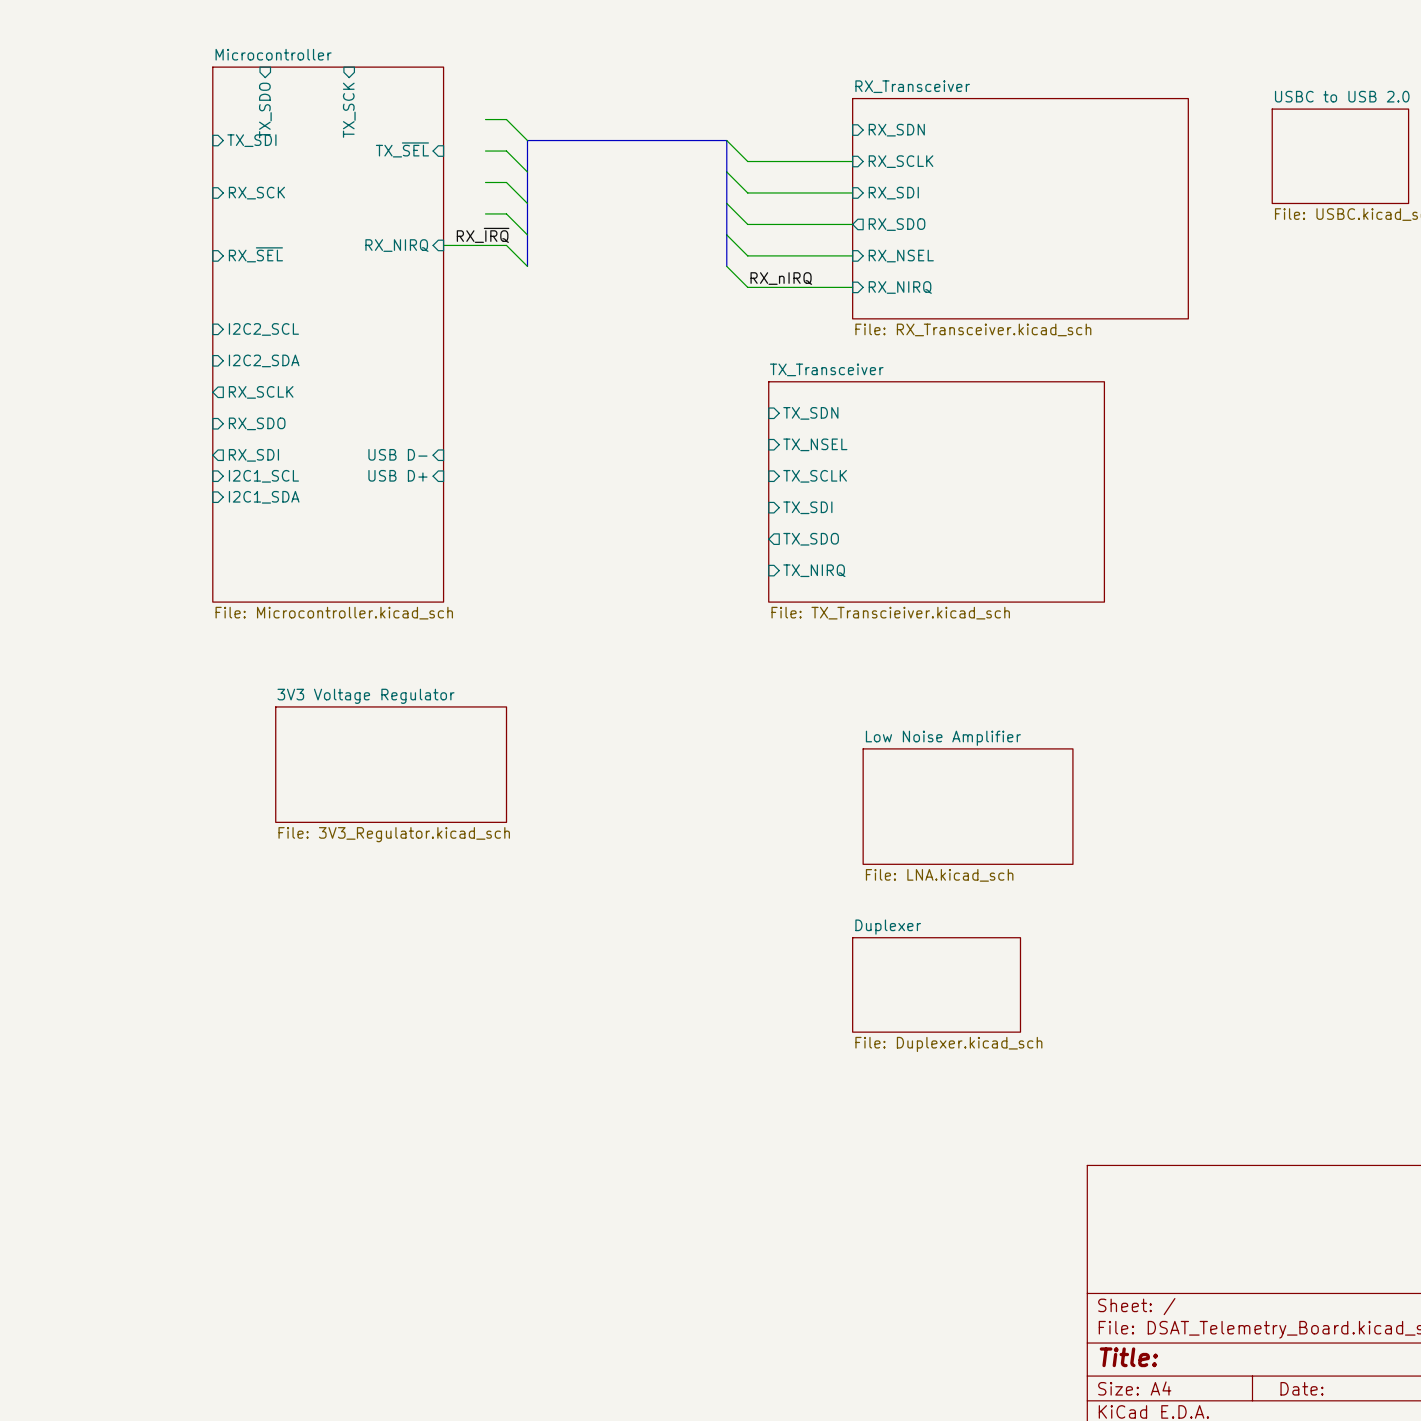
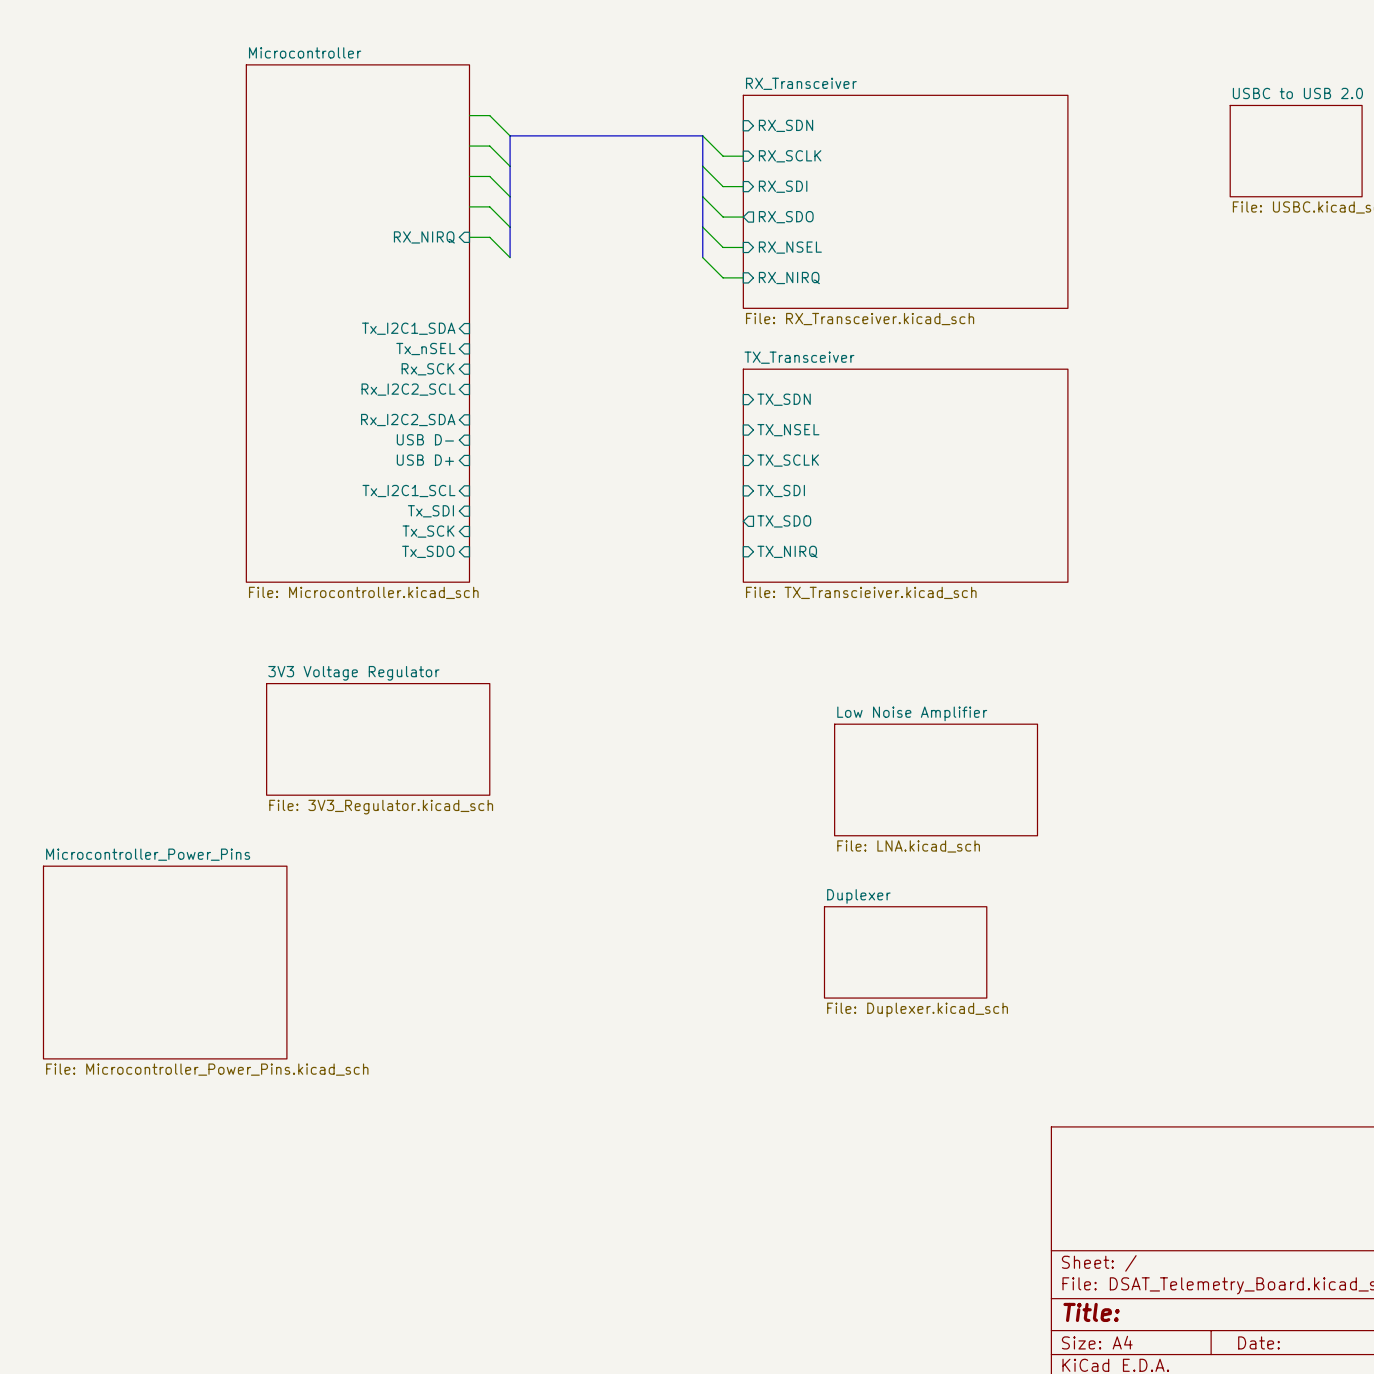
sheet pin: TX_SDO (265, 110) -> none
sheet pin: TX_SCK (349, 110) -> none
sheet pin position: RX_SDN (896, 130) -> RX_SDN (786, 125)
sheet pin: TX_SDI (251, 140) -> none
sheet pin: TX_~{SEL} (402, 149) -> none
wire: (768, 161) (852, 161) -> none
sheet pin position: RX_SCLK (901, 161) -> RX_SCLK (790, 156)
wire: (768, 192) (852, 192) -> none
sheet pin: RX_SCK (256, 193) -> none
sheet pin position: RX_SDI (893, 193) -> RX_SDI (783, 186)
sheet RX_Transceiver position: (1020, 208) -> (905, 201)
wire: (768, 224) (852, 224) -> none
sheet pin position: RX_SDO (897, 224) -> RX_SDO (786, 217)
label: RX_~{IRQ} (483, 235) -> none
sheet pin position: RX_NIRQ (396, 245) -> RX_NIRQ (424, 237)
wire: (443, 245) (485, 245) -> none
sheet pin: RX_~{SEL} (255, 254) -> none
wire: (768, 255) (852, 255) -> none
sheet pin position: RX_NSEL (901, 256) -> RX_NSEL (790, 247)
label: RX_nIRQ (781, 278) -> none
wire: (768, 287) (852, 287) -> none
sheet pin position: RX_NIRQ (900, 287) -> RX_NIRQ (789, 278)
sheet pin: I2C2_SCL (263, 329) -> none
sheet Microcontroller position: (328, 334) -> (357, 323)
sheet pin: none -> Tx_I2C1_SDA (408, 328)
sheet pin: I2C2_SDA (264, 360) -> none
sheet pin: none -> Tx_nSEL (425, 349)
sheet pin: none -> Rx_SCK (428, 369)
sheet pin: RX_SCLK (261, 392) -> none
sheet pin: none -> Rx_I2C2_SCL (408, 389)
sheet pin: RX_SDO (257, 423) -> none
sheet pin: none -> Rx_I2C2_SDA (408, 420)
sheet pin position: USB D- (397, 454) -> USB D- (425, 439)
sheet pin: RX_SDI (253, 455) -> none
sheet pin position: USB D+ (397, 475) -> USB D+ (425, 460)
sheet pin: I2C1_SCL (263, 476) -> none
sheet pin: I2C1_SDA (264, 497) -> none
sheet pin: none -> Tx_I2C1_SCL (408, 491)
sheet pin: none -> Tx_SDI (430, 511)
sheet pin: none -> Tx_SCK (428, 531)
sheet pin: none -> Tx_SDO (428, 551)
sheet Microcontroller_Power_Pins: none -> File: Microcontroller_Power_Pins.kicad_sch (165, 962)

